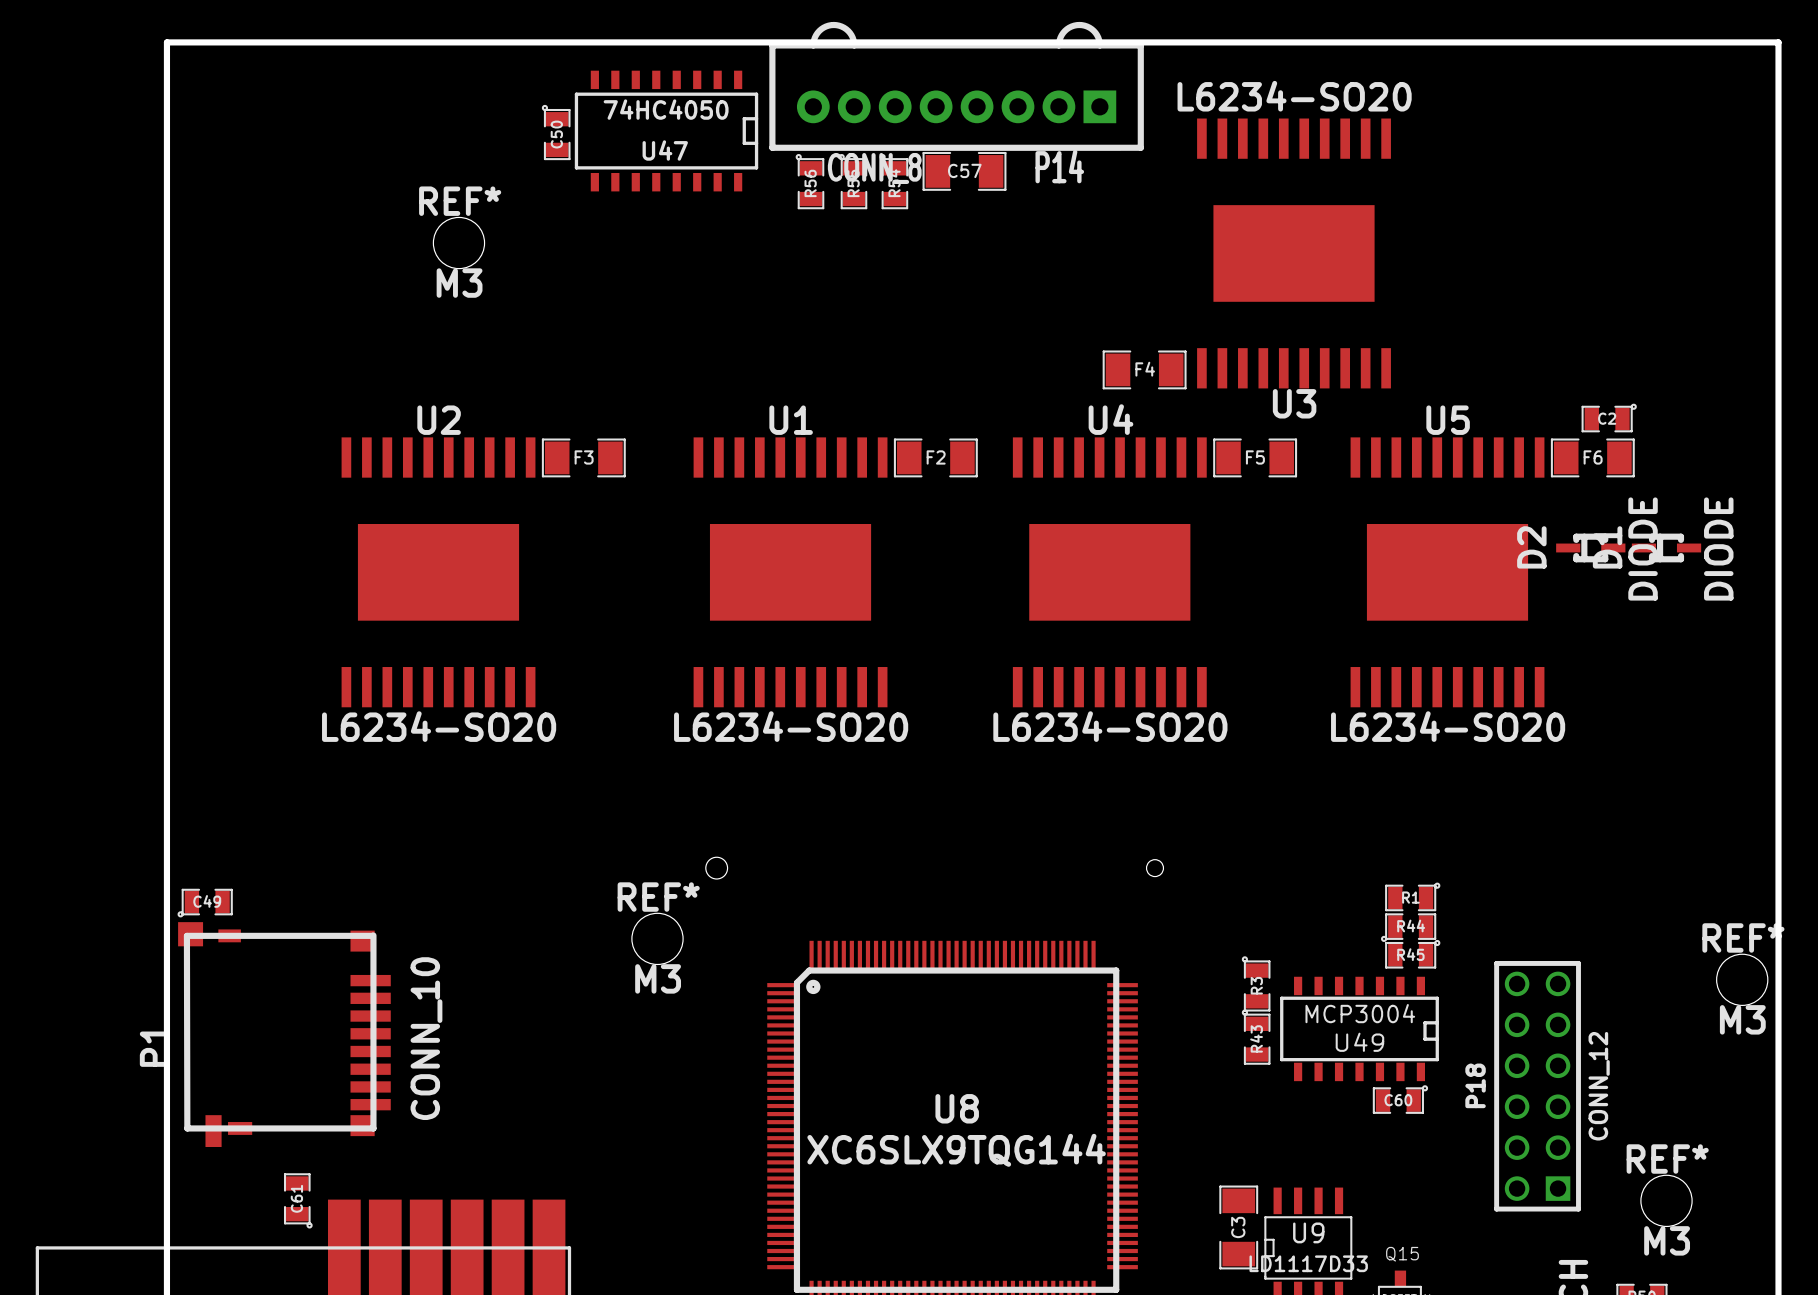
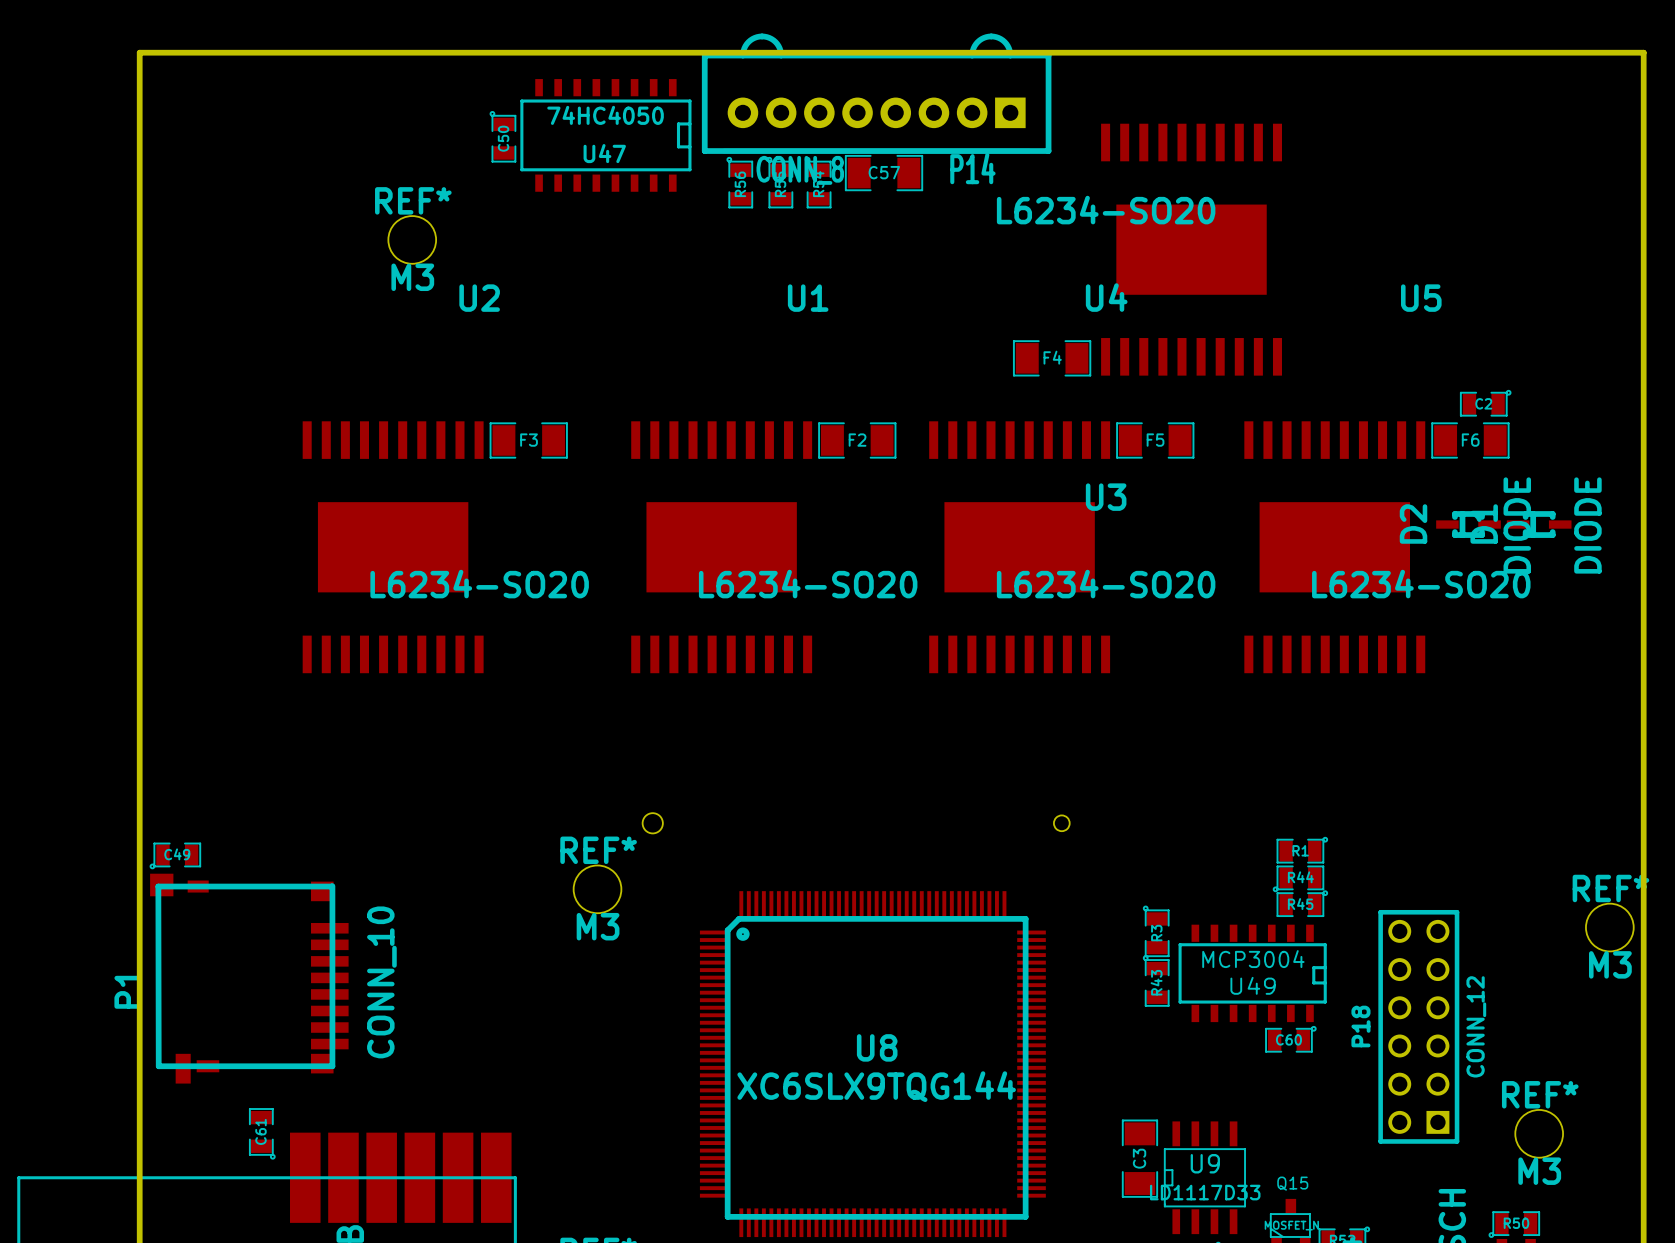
U3 value position: L6234-SO20 (1294, 96) -> L6234-SO20 (1106, 210)
U3 name position: U3 (1294, 403) -> U3 (1106, 497)
U4 name position: U4 (1110, 419) -> U4 (1106, 297)
U2 name position: U2 (439, 420) -> U2 (479, 298)
U1 name position: U1 (791, 420) -> U1 (808, 298)
U5 name position: U5 (1448, 420) -> U5 (1421, 298)
U2 value position: L6234-SO20 (439, 726) -> L6234-SO20 (479, 584)
U1 value position: L6234-SO20 (791, 726) -> L6234-SO20 (808, 584)
U4 value position: L6234-SO20 (1110, 726) -> L6234-SO20 (1106, 584)
U5 value position: L6234-SO20 (1448, 726) -> L6234-SO20 (1421, 584)

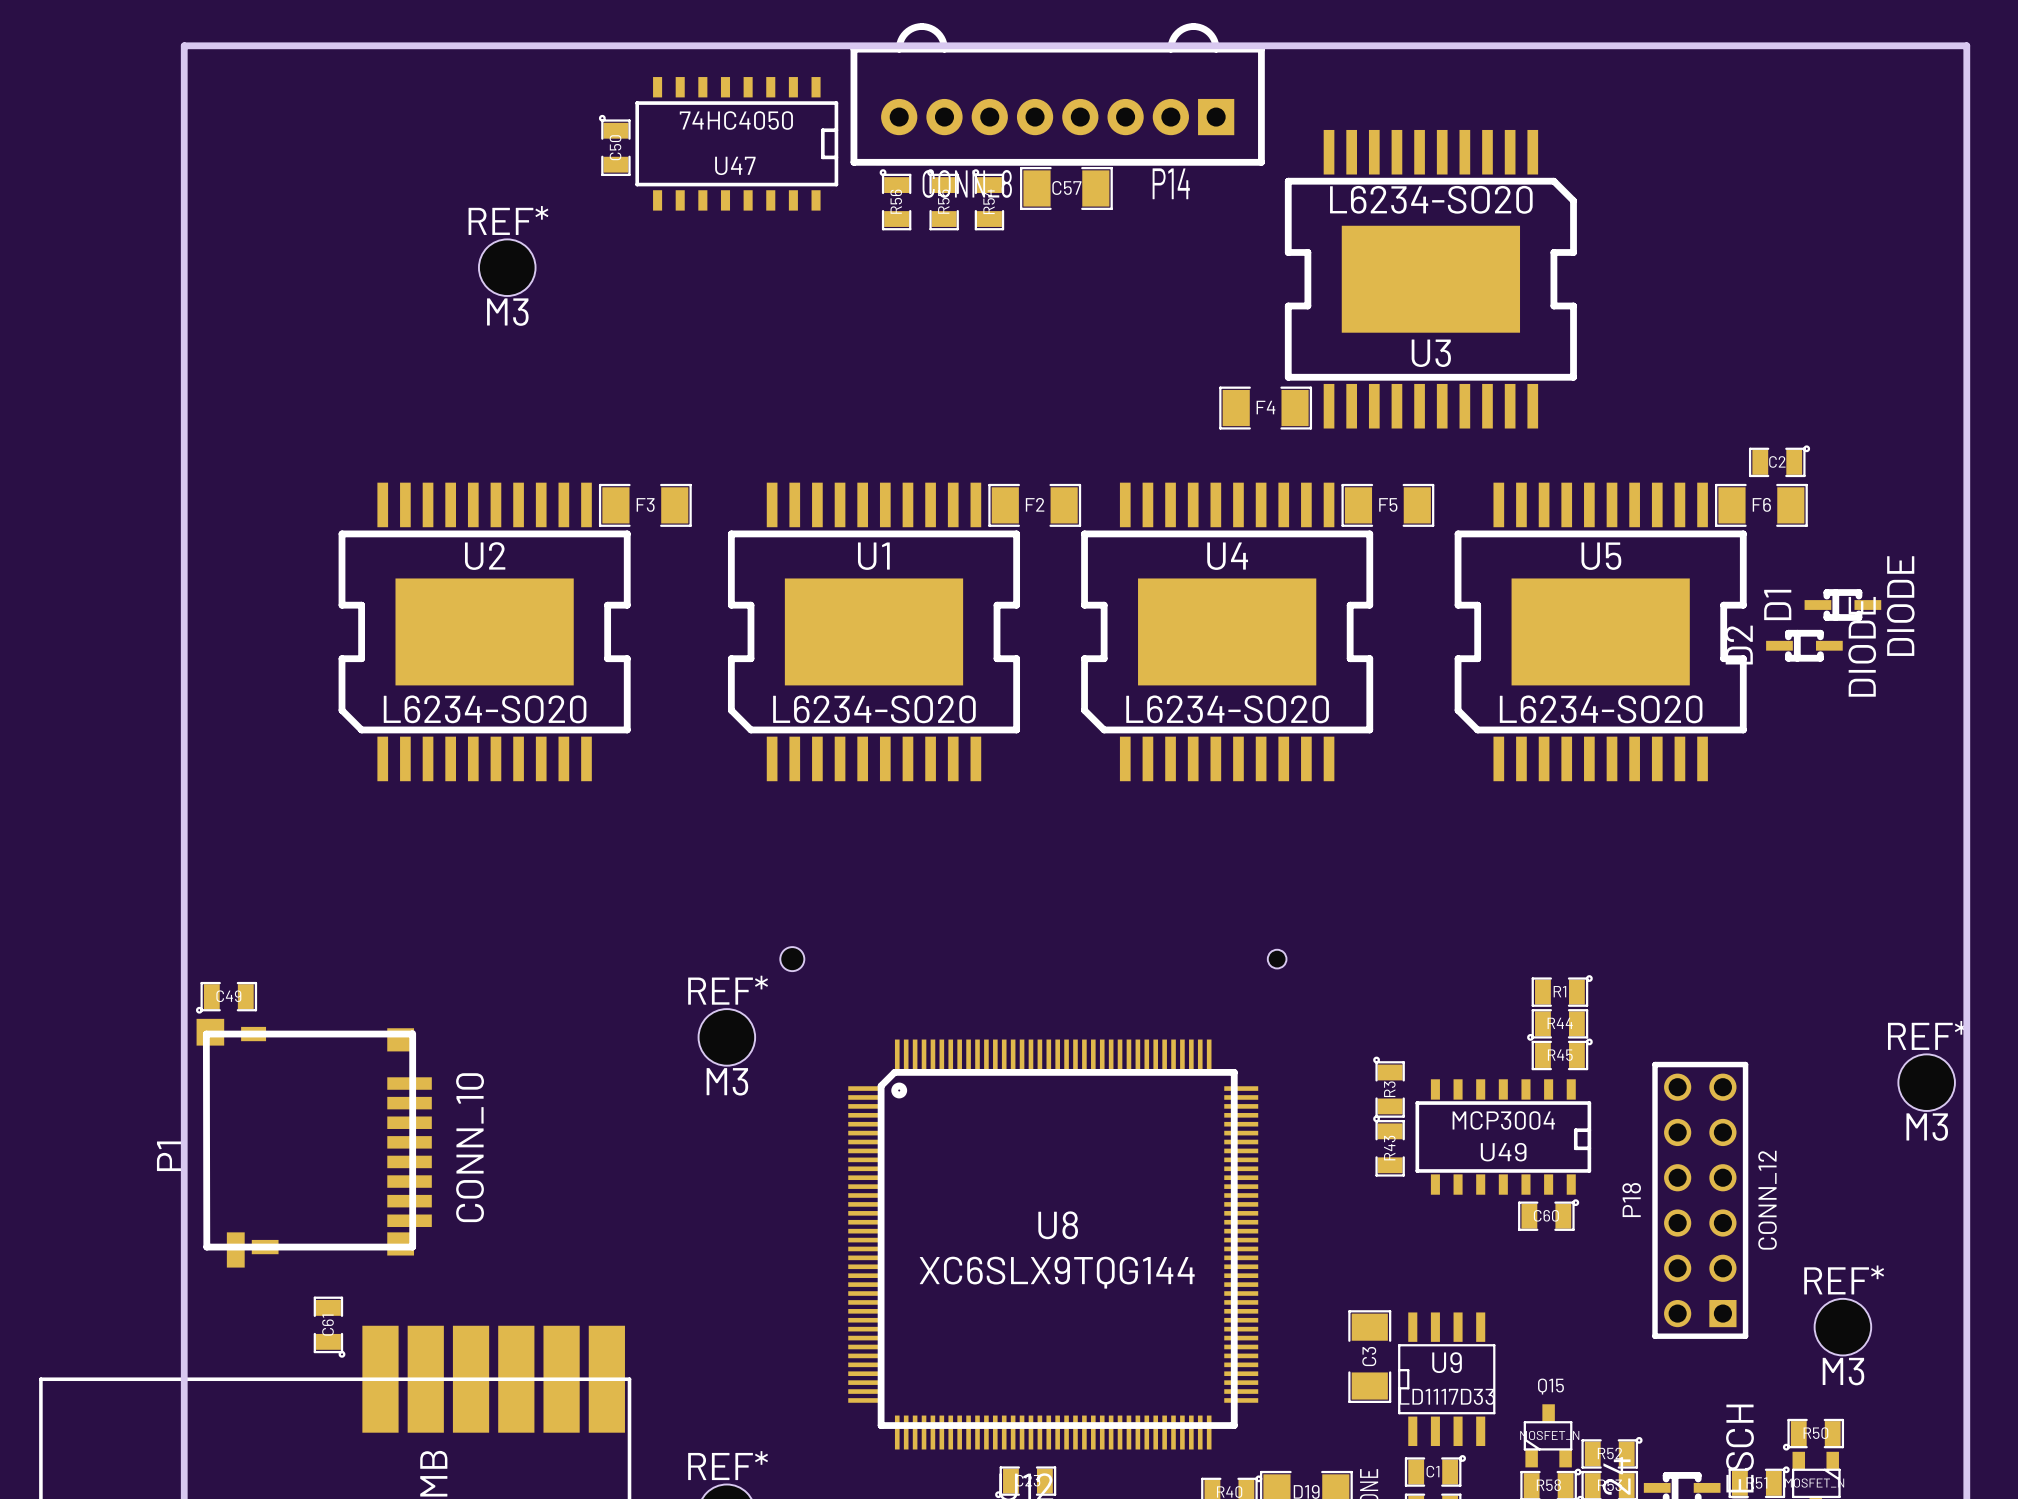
U3 footprint: [1101, 123, 1283, 376] -> [1284, 129, 1577, 429]
U3 value position: L6234-SO20 (1106, 210) -> L6234-SO20 (1431, 199)
U4 name position: U4 (1106, 297) -> U4 (1227, 556)
U2 name position: U2 (479, 298) -> U2 (485, 556)
U1 name position: U1 (808, 298) -> U1 (873, 556)
U5 name position: U5 (1421, 298) -> U5 (1601, 556)
U2 footprint: [302, 421, 484, 674] -> [338, 482, 631, 782]
U1 footprint: [631, 421, 813, 674] -> [727, 482, 1021, 782]
U4 footprint: [929, 421, 1111, 674] -> [1081, 482, 1374, 782]
U5 footprint: [1244, 421, 1426, 674] -> [1454, 482, 1747, 782]
U3 name position: U3 (1106, 497) -> U3 (1431, 353)
D2 position: (1468, 524) -> (1804, 645)
U2 value position: L6234-SO20 (479, 584) -> L6234-SO20 (485, 709)
U1 value position: L6234-SO20 (808, 584) -> L6234-SO20 (874, 709)
U4 value position: L6234-SO20 (1106, 584) -> L6234-SO20 (1227, 709)
U5 value position: L6234-SO20 (1421, 584) -> L6234-SO20 (1601, 709)

